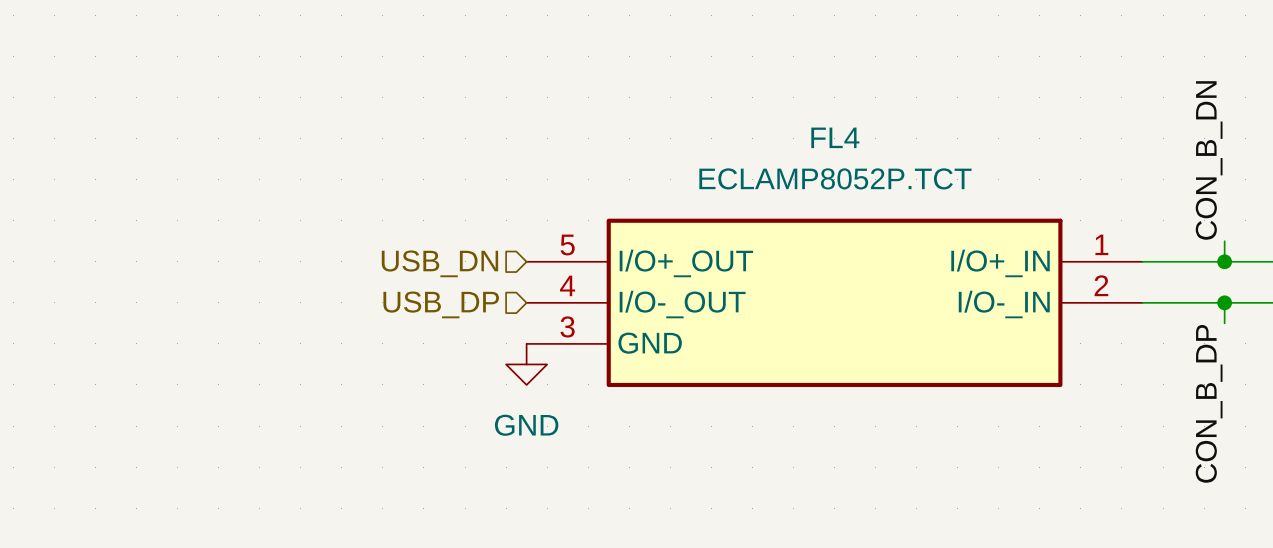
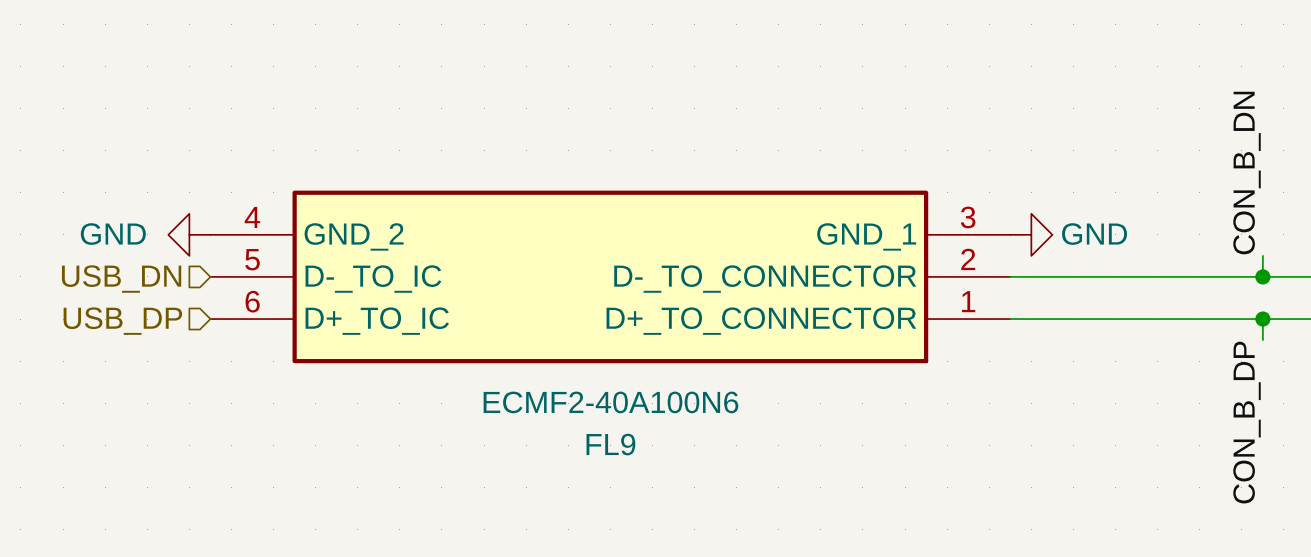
power symbol: none -> GND (189, 234)
power symbol: none -> GND (1031, 234)
FL9: none -> ECMF2-40A100N6 (610, 276)
hierarchical label position: USB_DN (439, 263) -> USB_DN (121, 279)
FL4: ECLAMP8052P.TCT (834, 302) -> none
hierarchical label position: USB_DP (441, 304) -> USB_DP (122, 321)
power symbol: GND (526, 364) -> none

